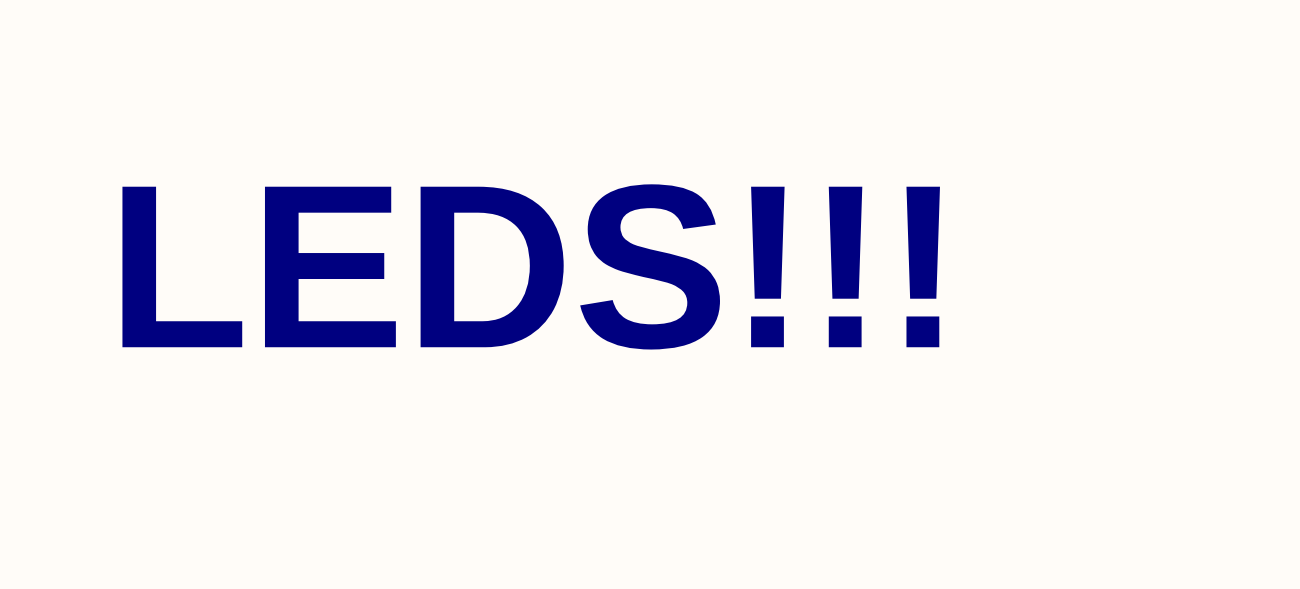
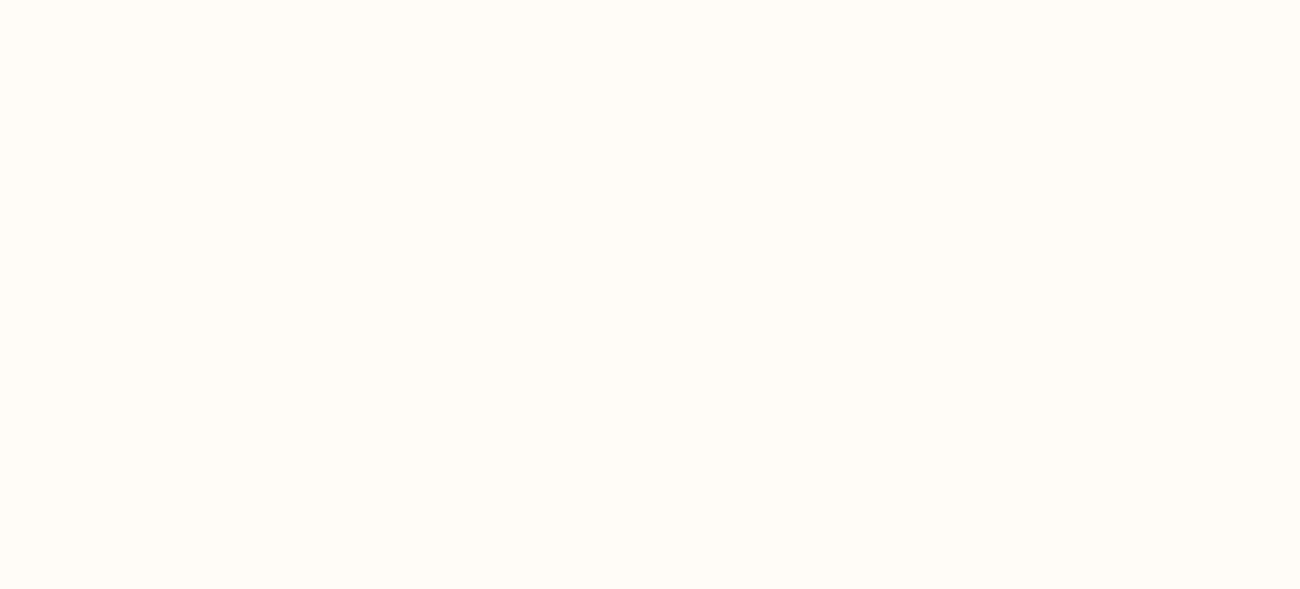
text: LEDS!!! (531, 266) -> none

